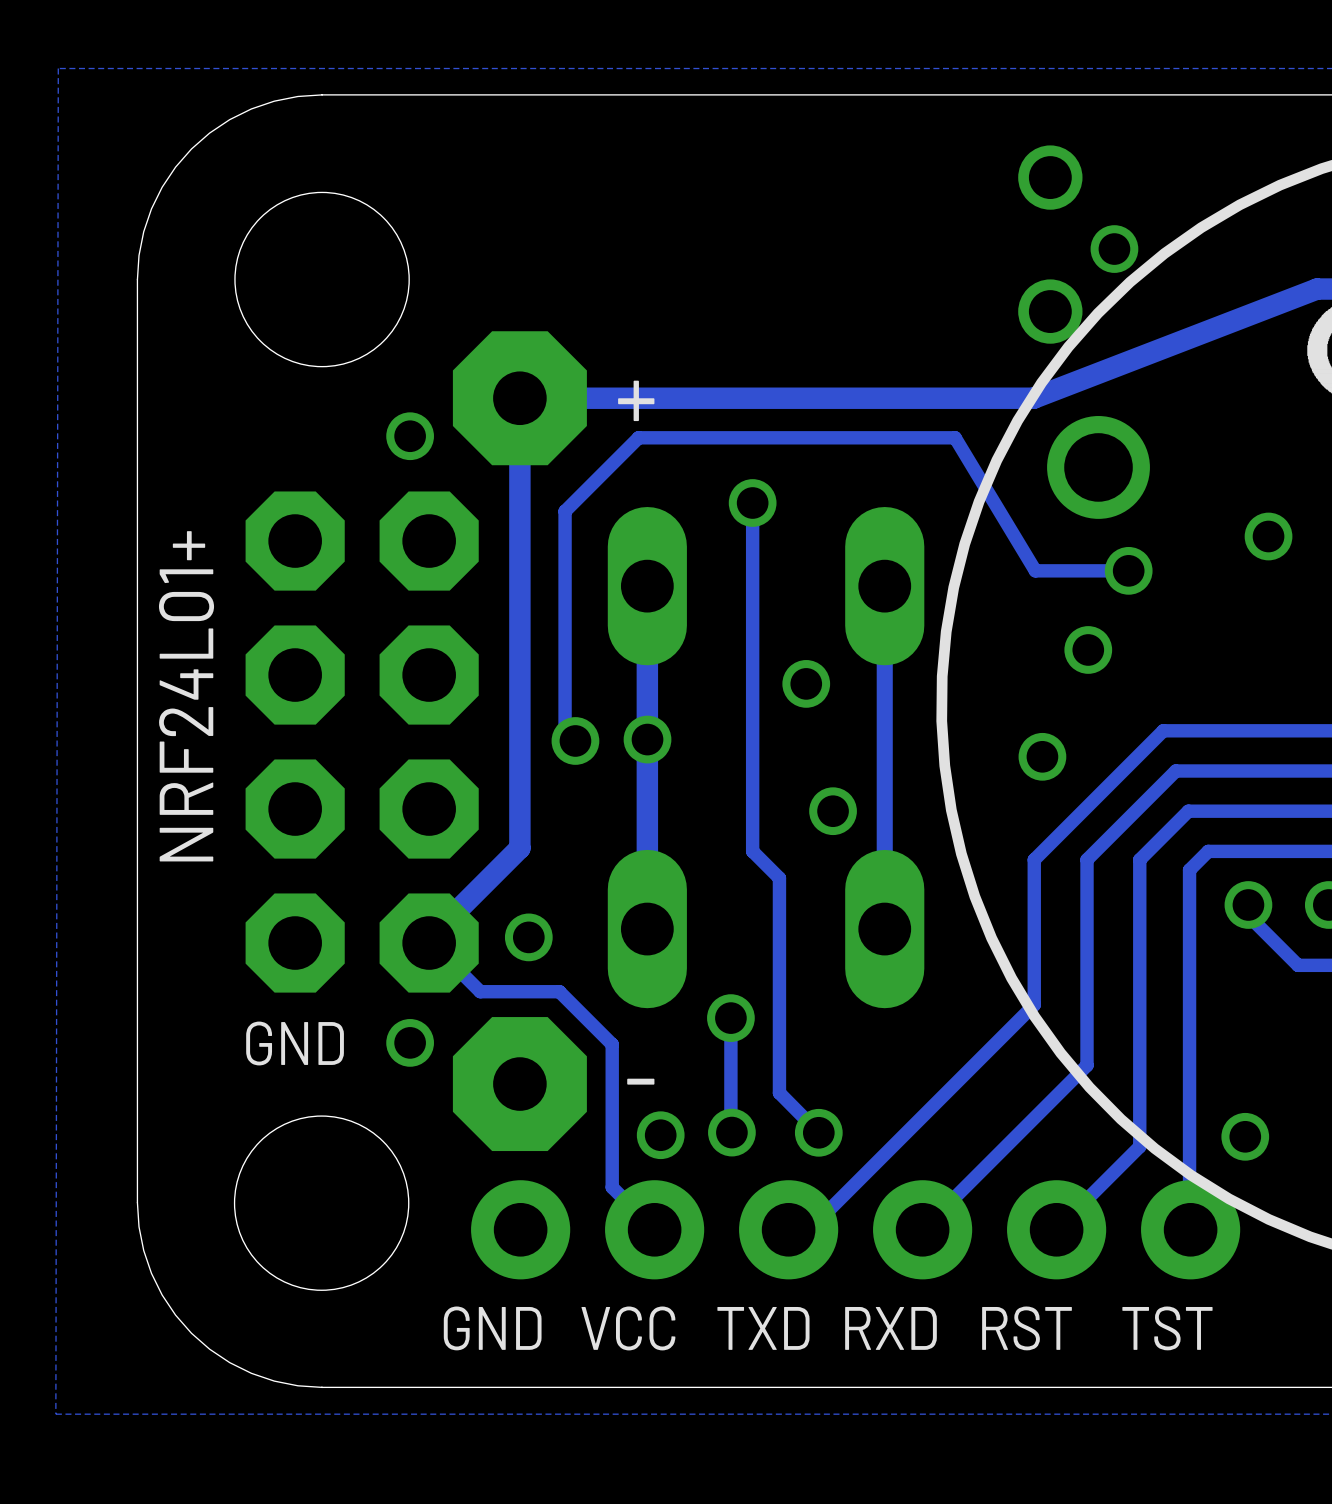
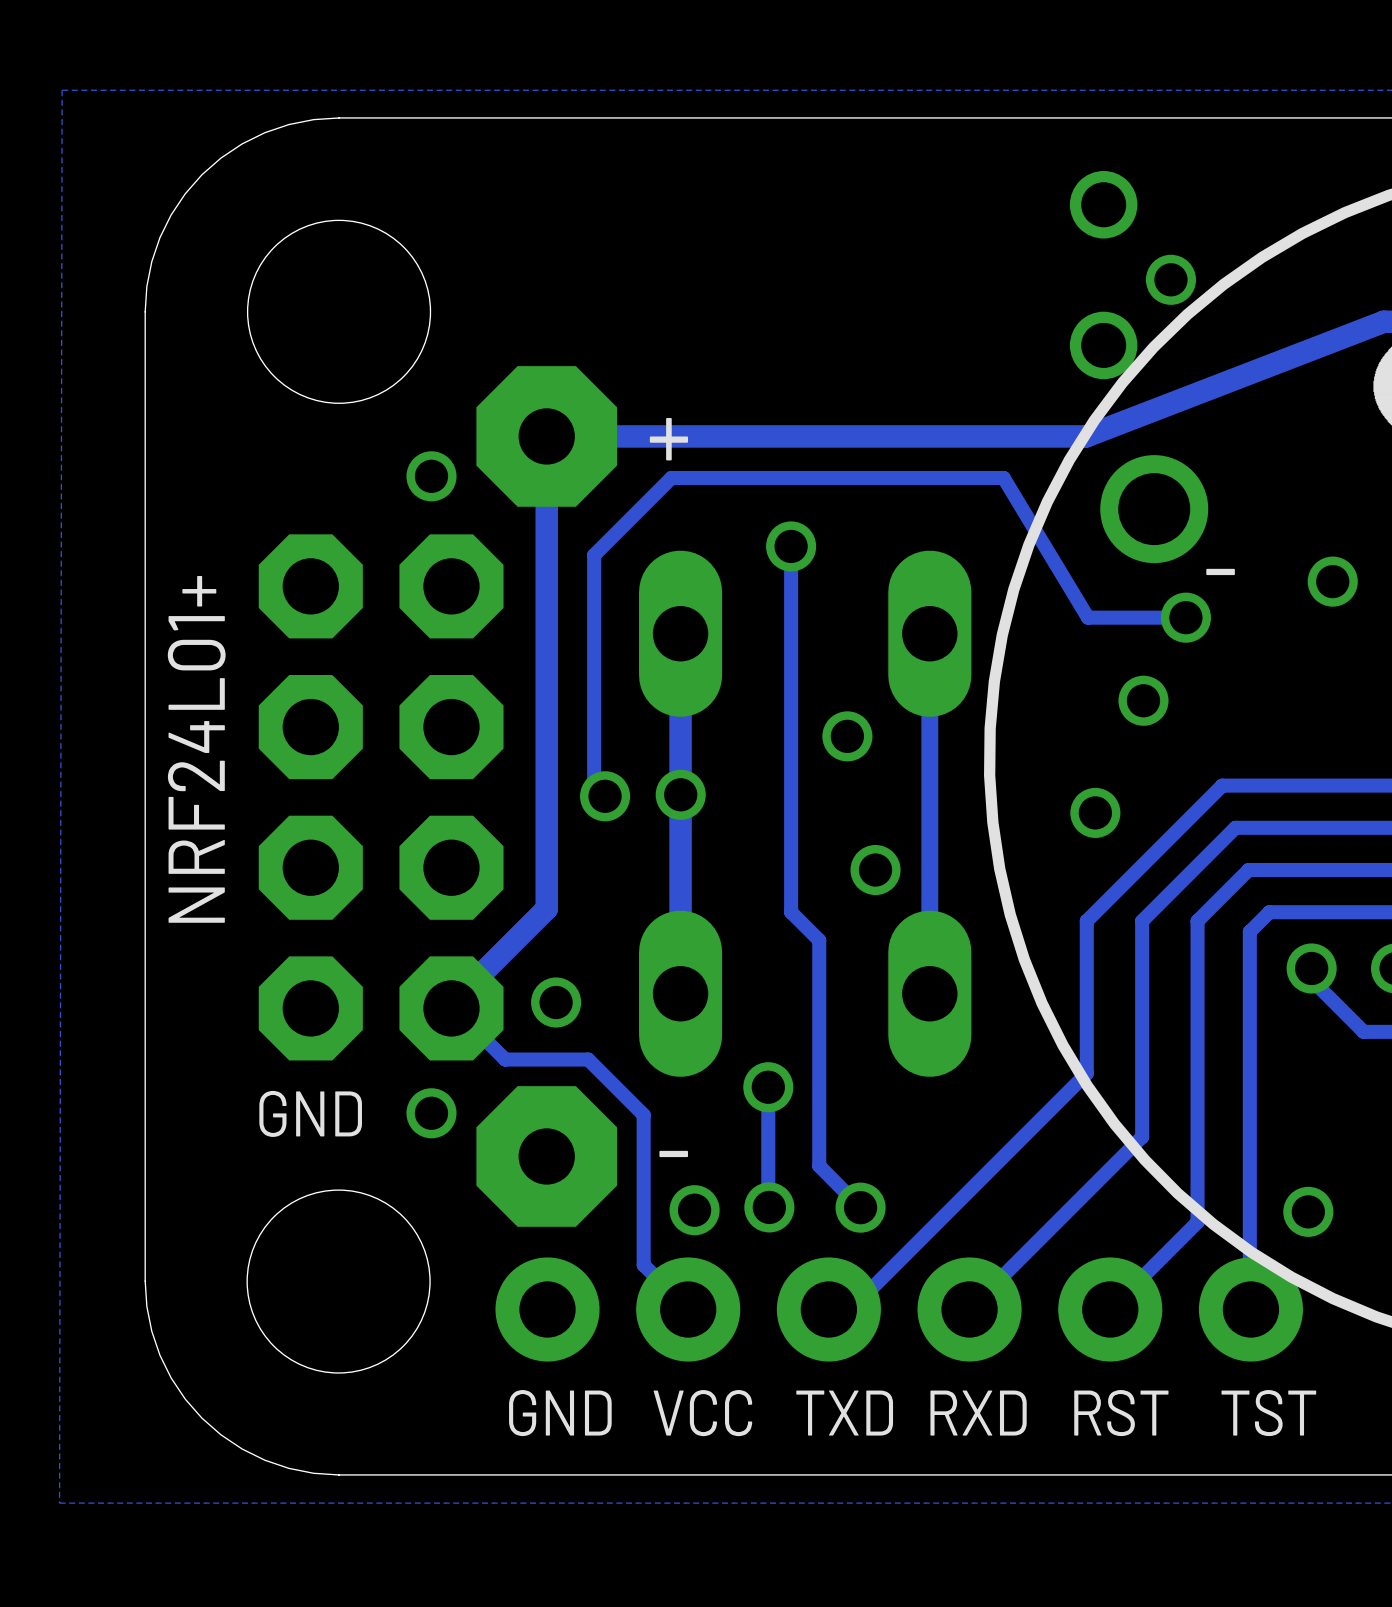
text: none -> - (1220, 571)
text position: GND (492, 1328) -> GND (560, 1413)
text position: VCC (628, 1328) -> VCC (702, 1413)
text position: TXD (763, 1328) -> TXD (844, 1413)
text position: RXD (890, 1328) -> RXD (978, 1413)
text position: RST (1026, 1328) -> RST (1121, 1413)
text position: TST (1167, 1328) -> TST (1268, 1413)

